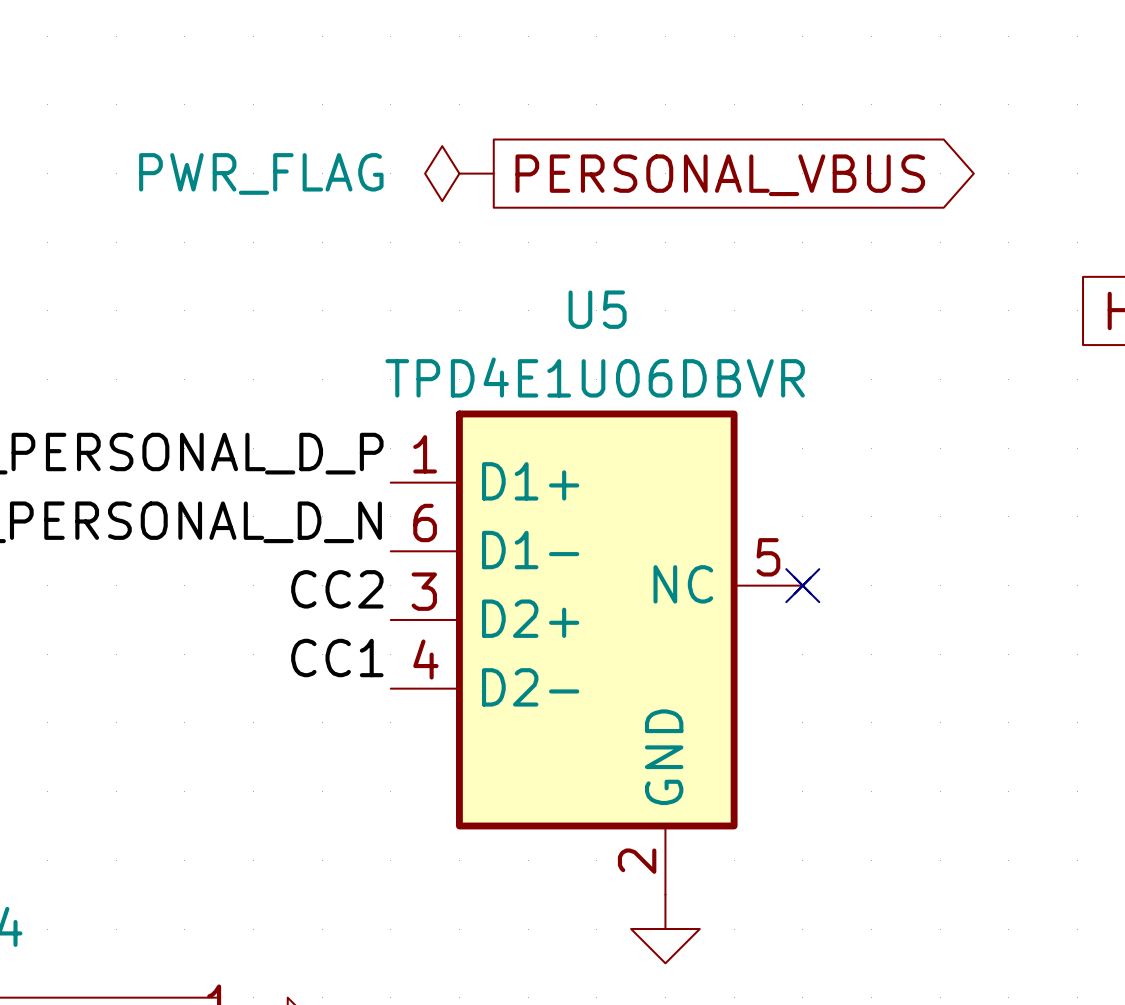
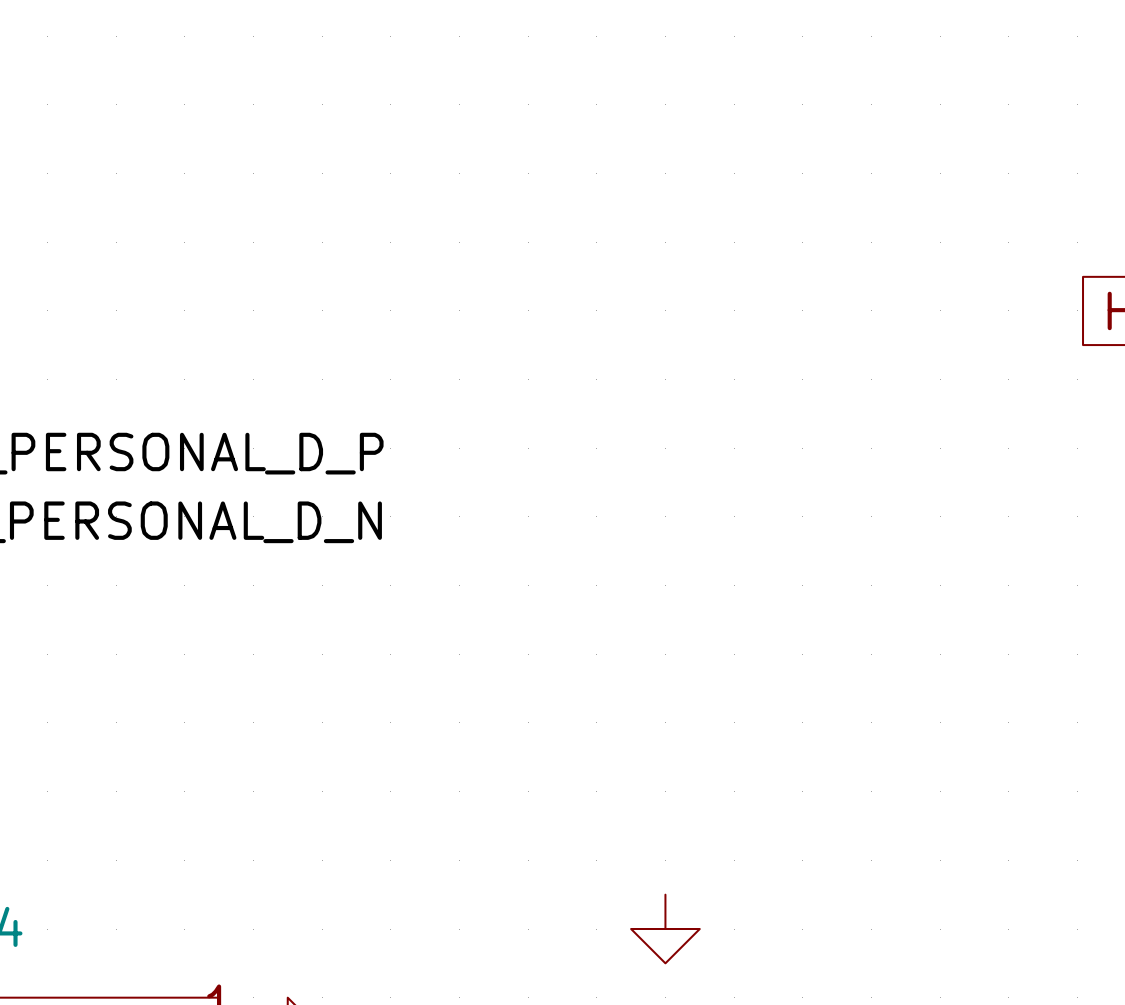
power symbol: PWR_FLAG (459, 173) -> none
global label: PERSONAL_VBUS (720, 175) -> none
no-connect mark: (802, 585) -> none
label: CC2 (337, 589) -> none
U5: TPD4E1U06DBVR (600, 652) -> none
label: CC1 (337, 658) -> none

